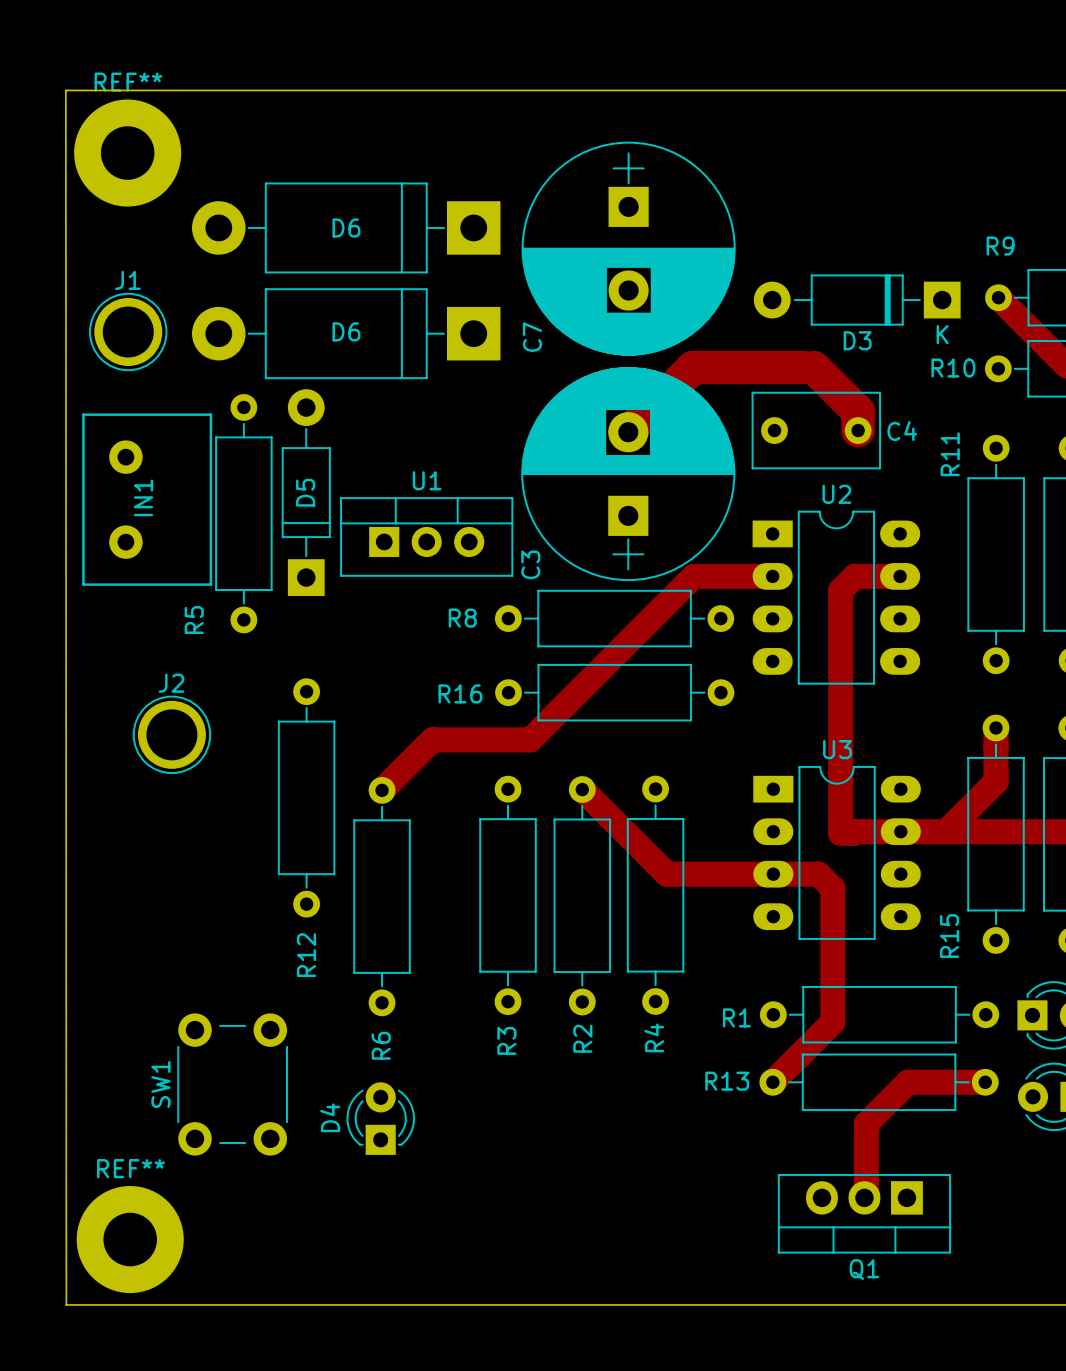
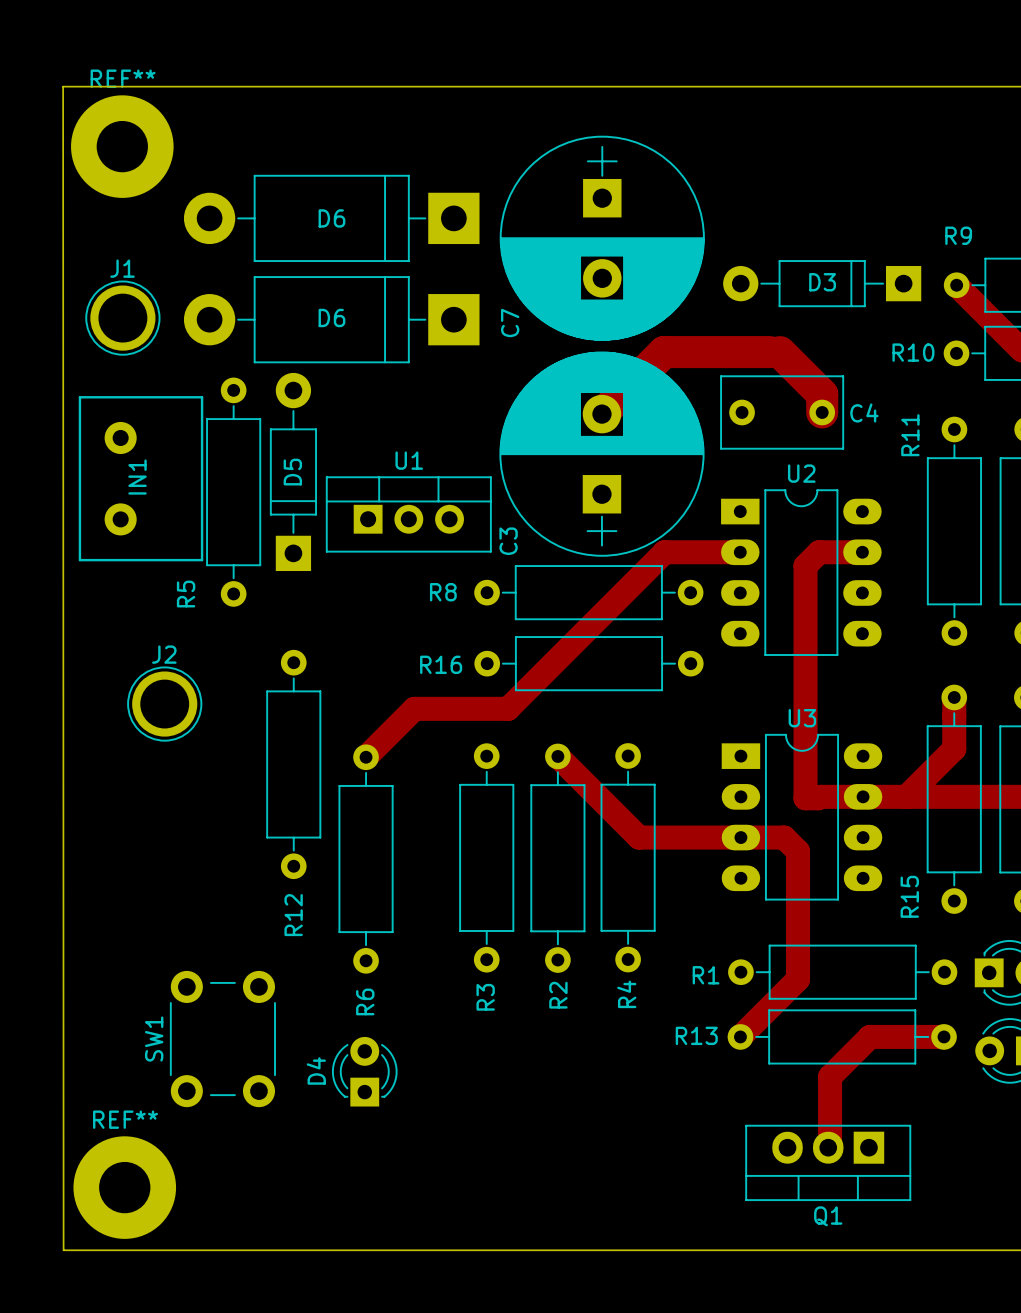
D3 footprint: [753, 274, 961, 326] -> [723, 260, 922, 308]
D3 name position: D3 (857, 340) -> D3 (822, 282)

